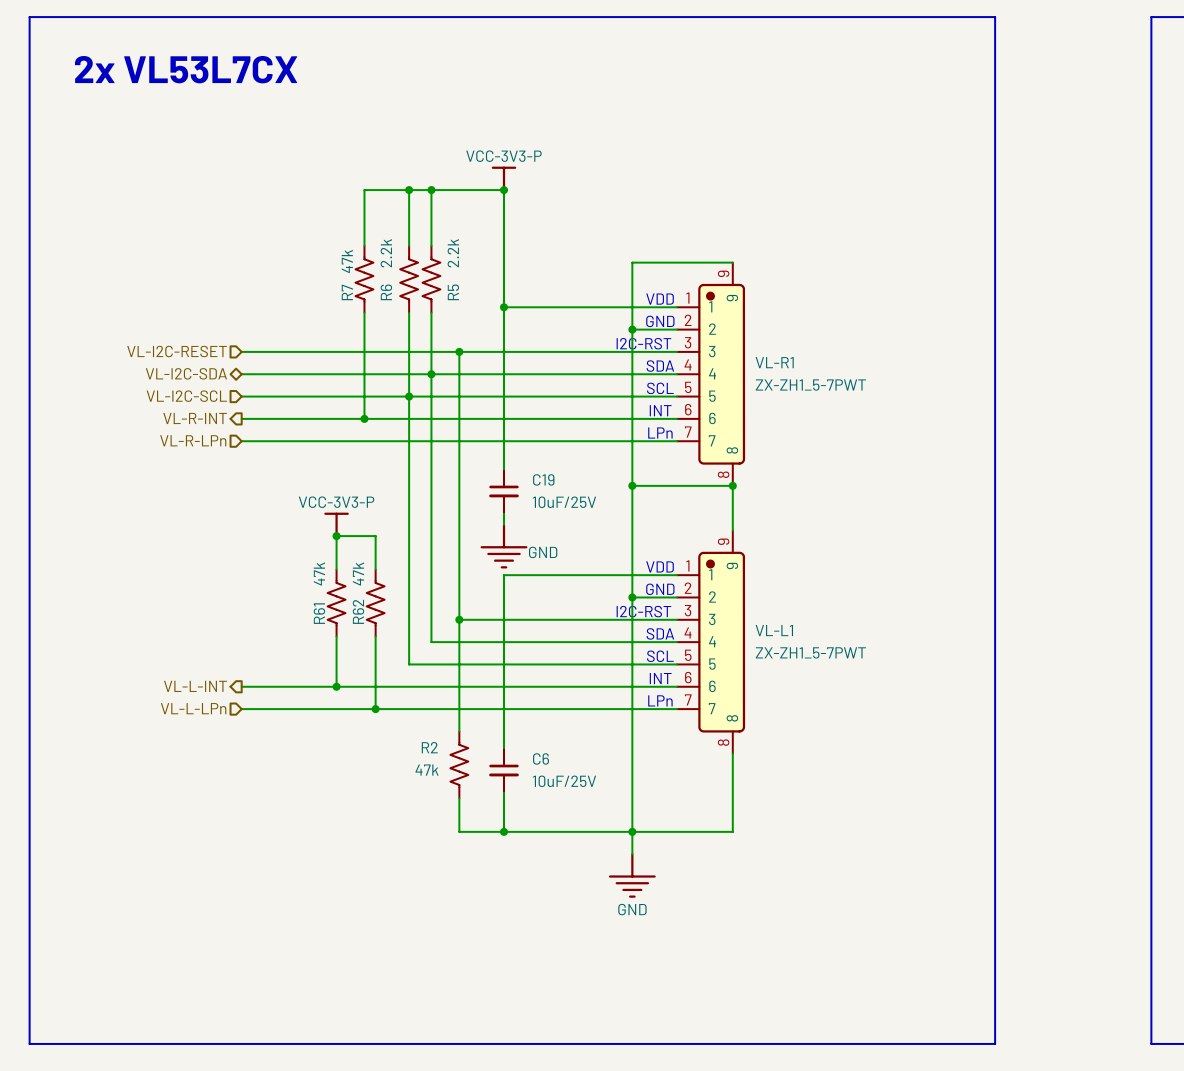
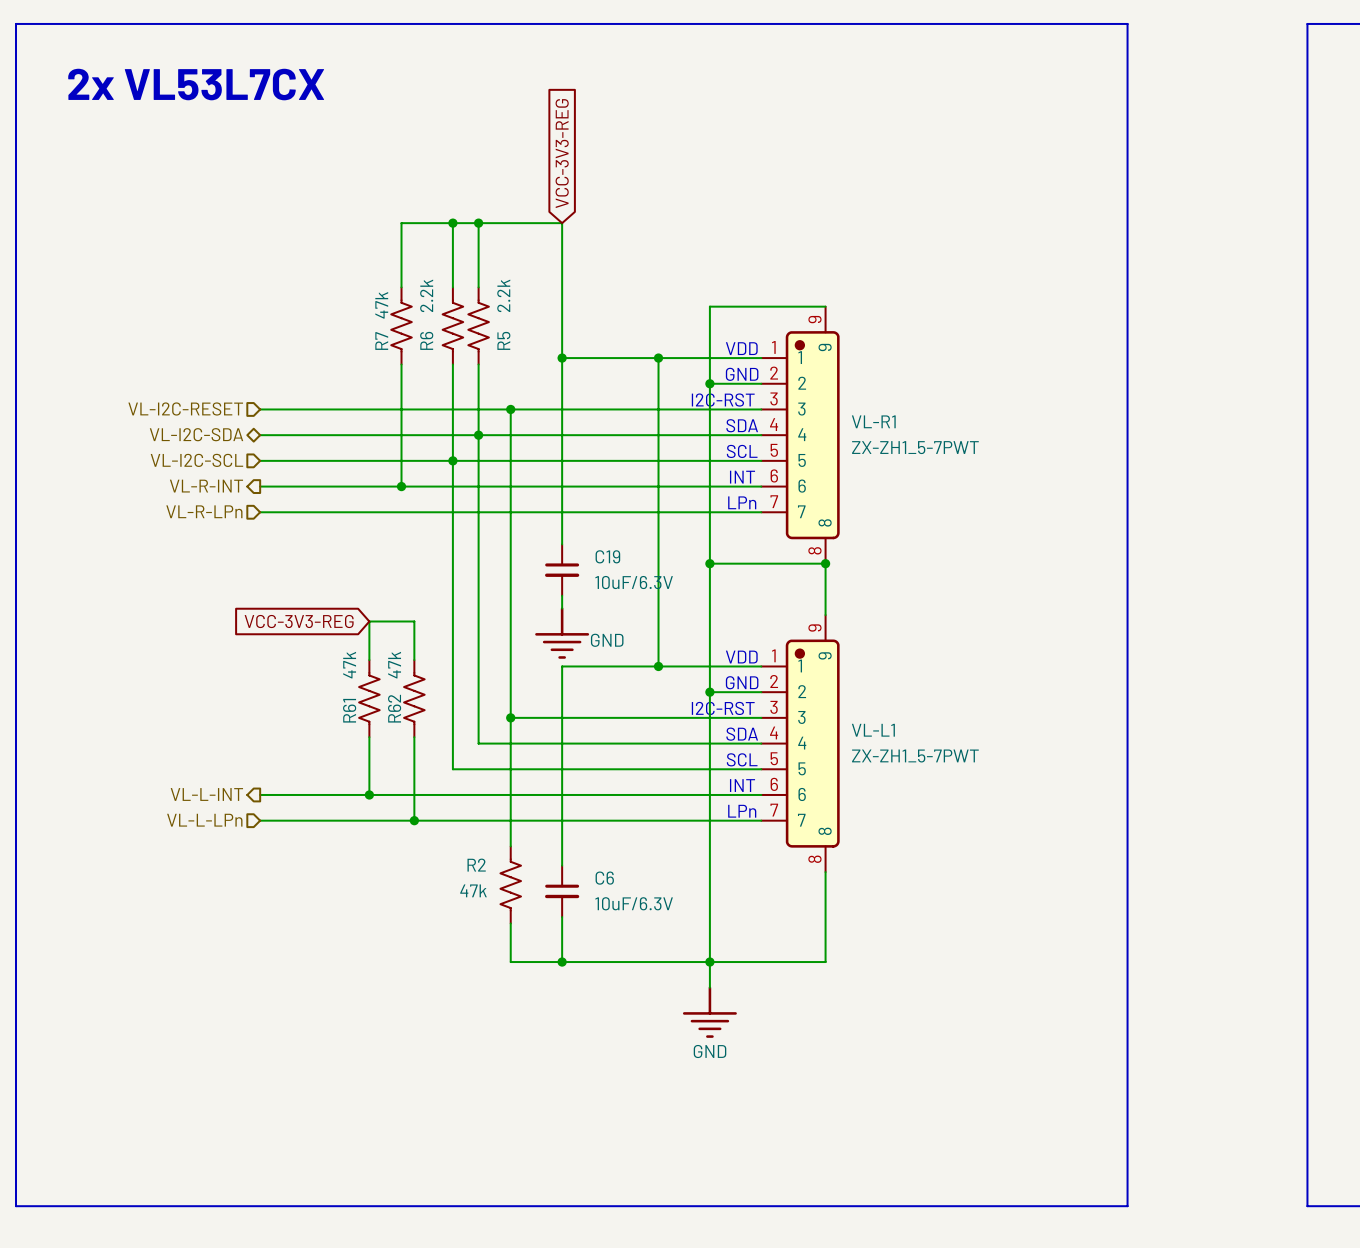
global label: none -> VCC-3V3-REG (562, 153)
power symbol: VCC-3V3-P (503, 178) -> none
junction: (503, 190) -> none
wire: none -> (658, 358) (658, 666)
junction: none -> (658, 358)
C19 value: 10uF/25V (564, 502) -> 10uF/6.3V (634, 582)
power symbol: VCC-3V3-P (336, 524) -> none
global label: none -> VCC-3V3-REG (299, 621)
junction: (336, 536) -> none
junction: none -> (658, 666)
C6 value: 10uF/25V (564, 781) -> 10uF/6.3V (634, 903)

